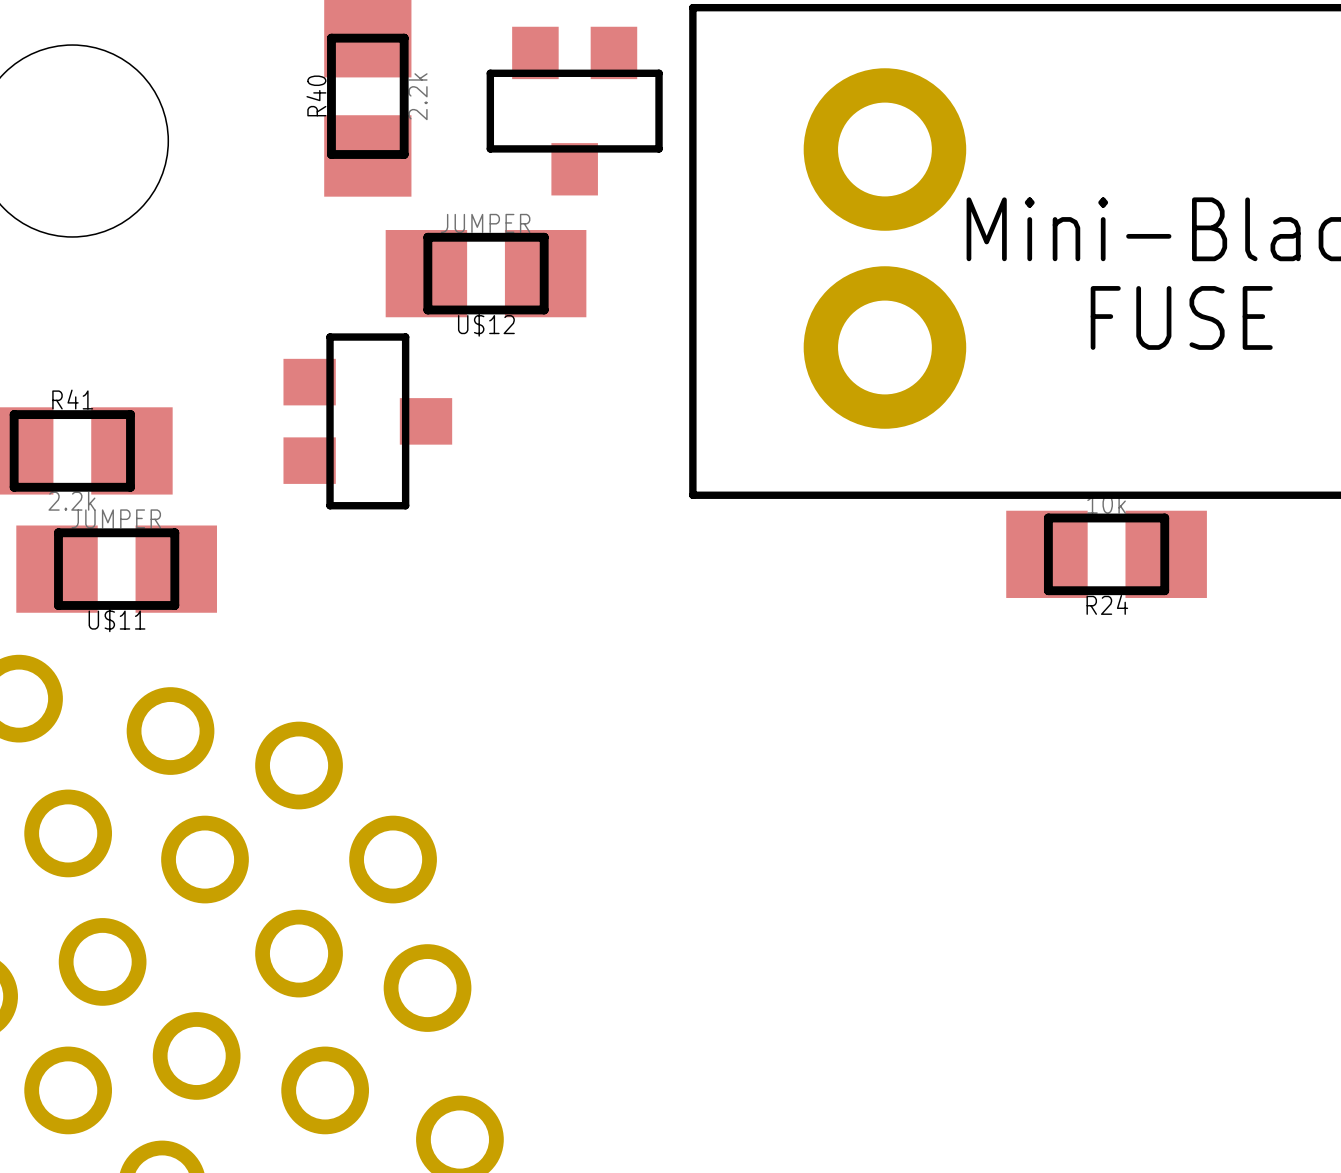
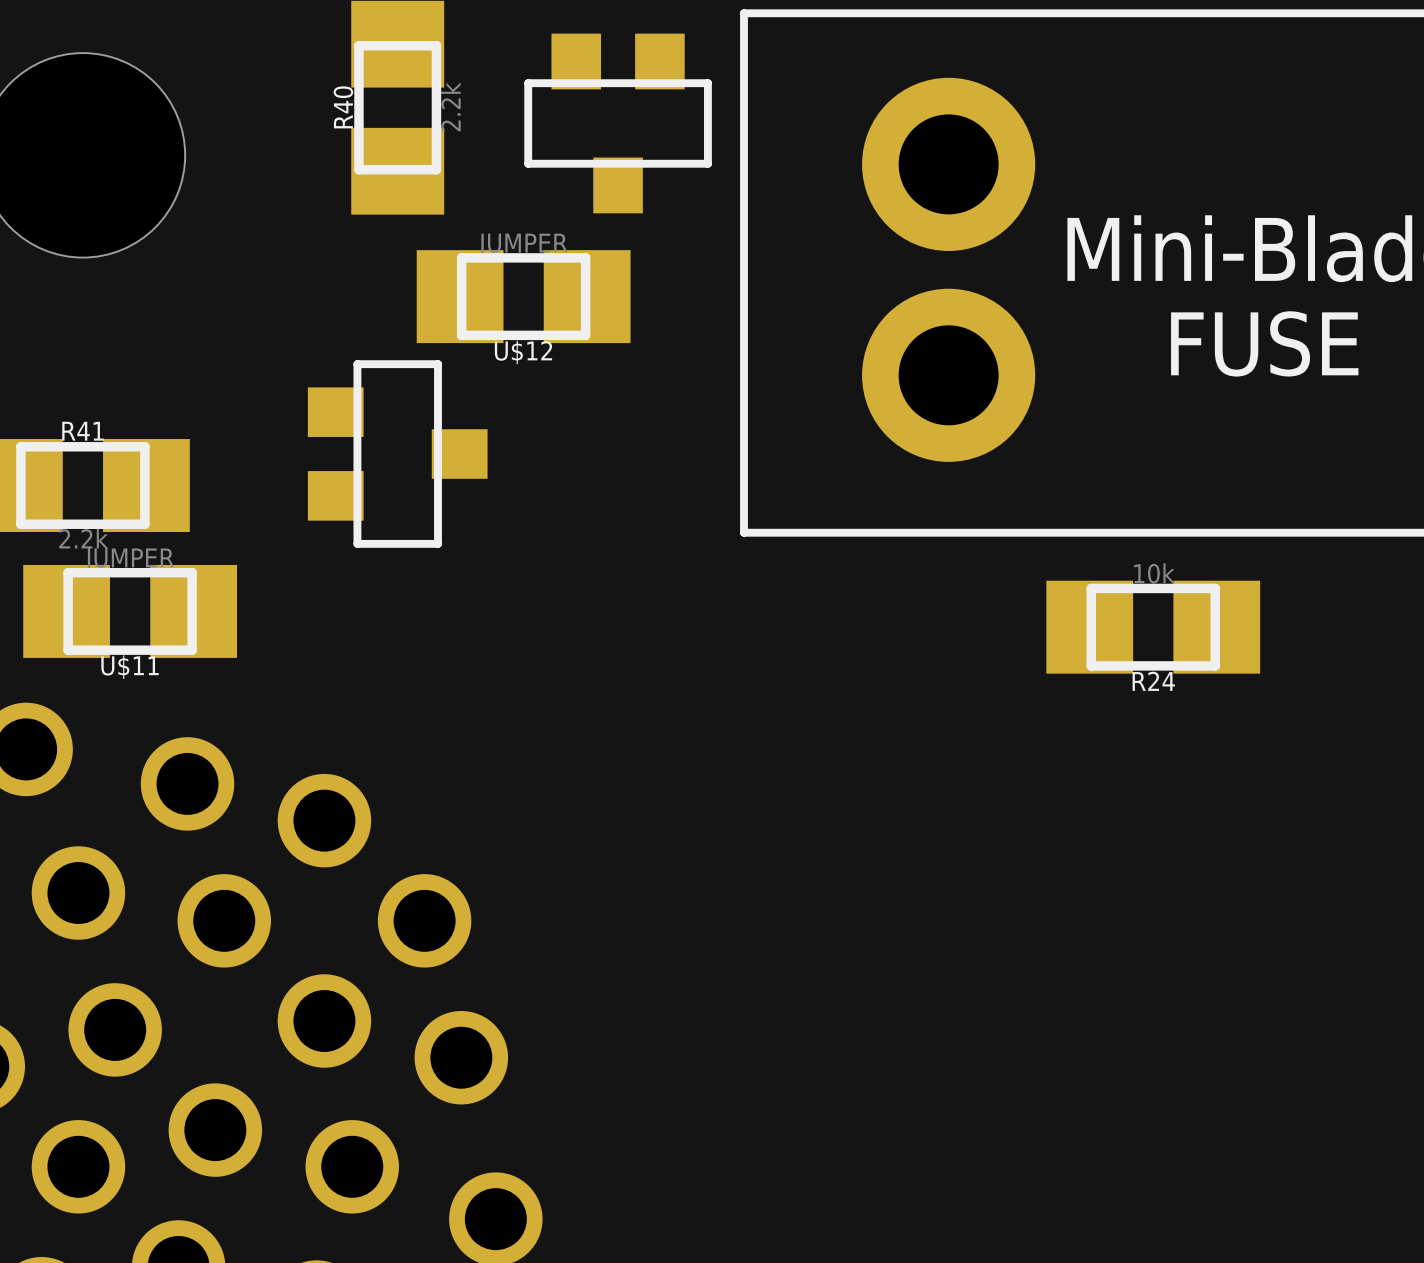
R24 position: (1106, 554) -> (1153, 627)

